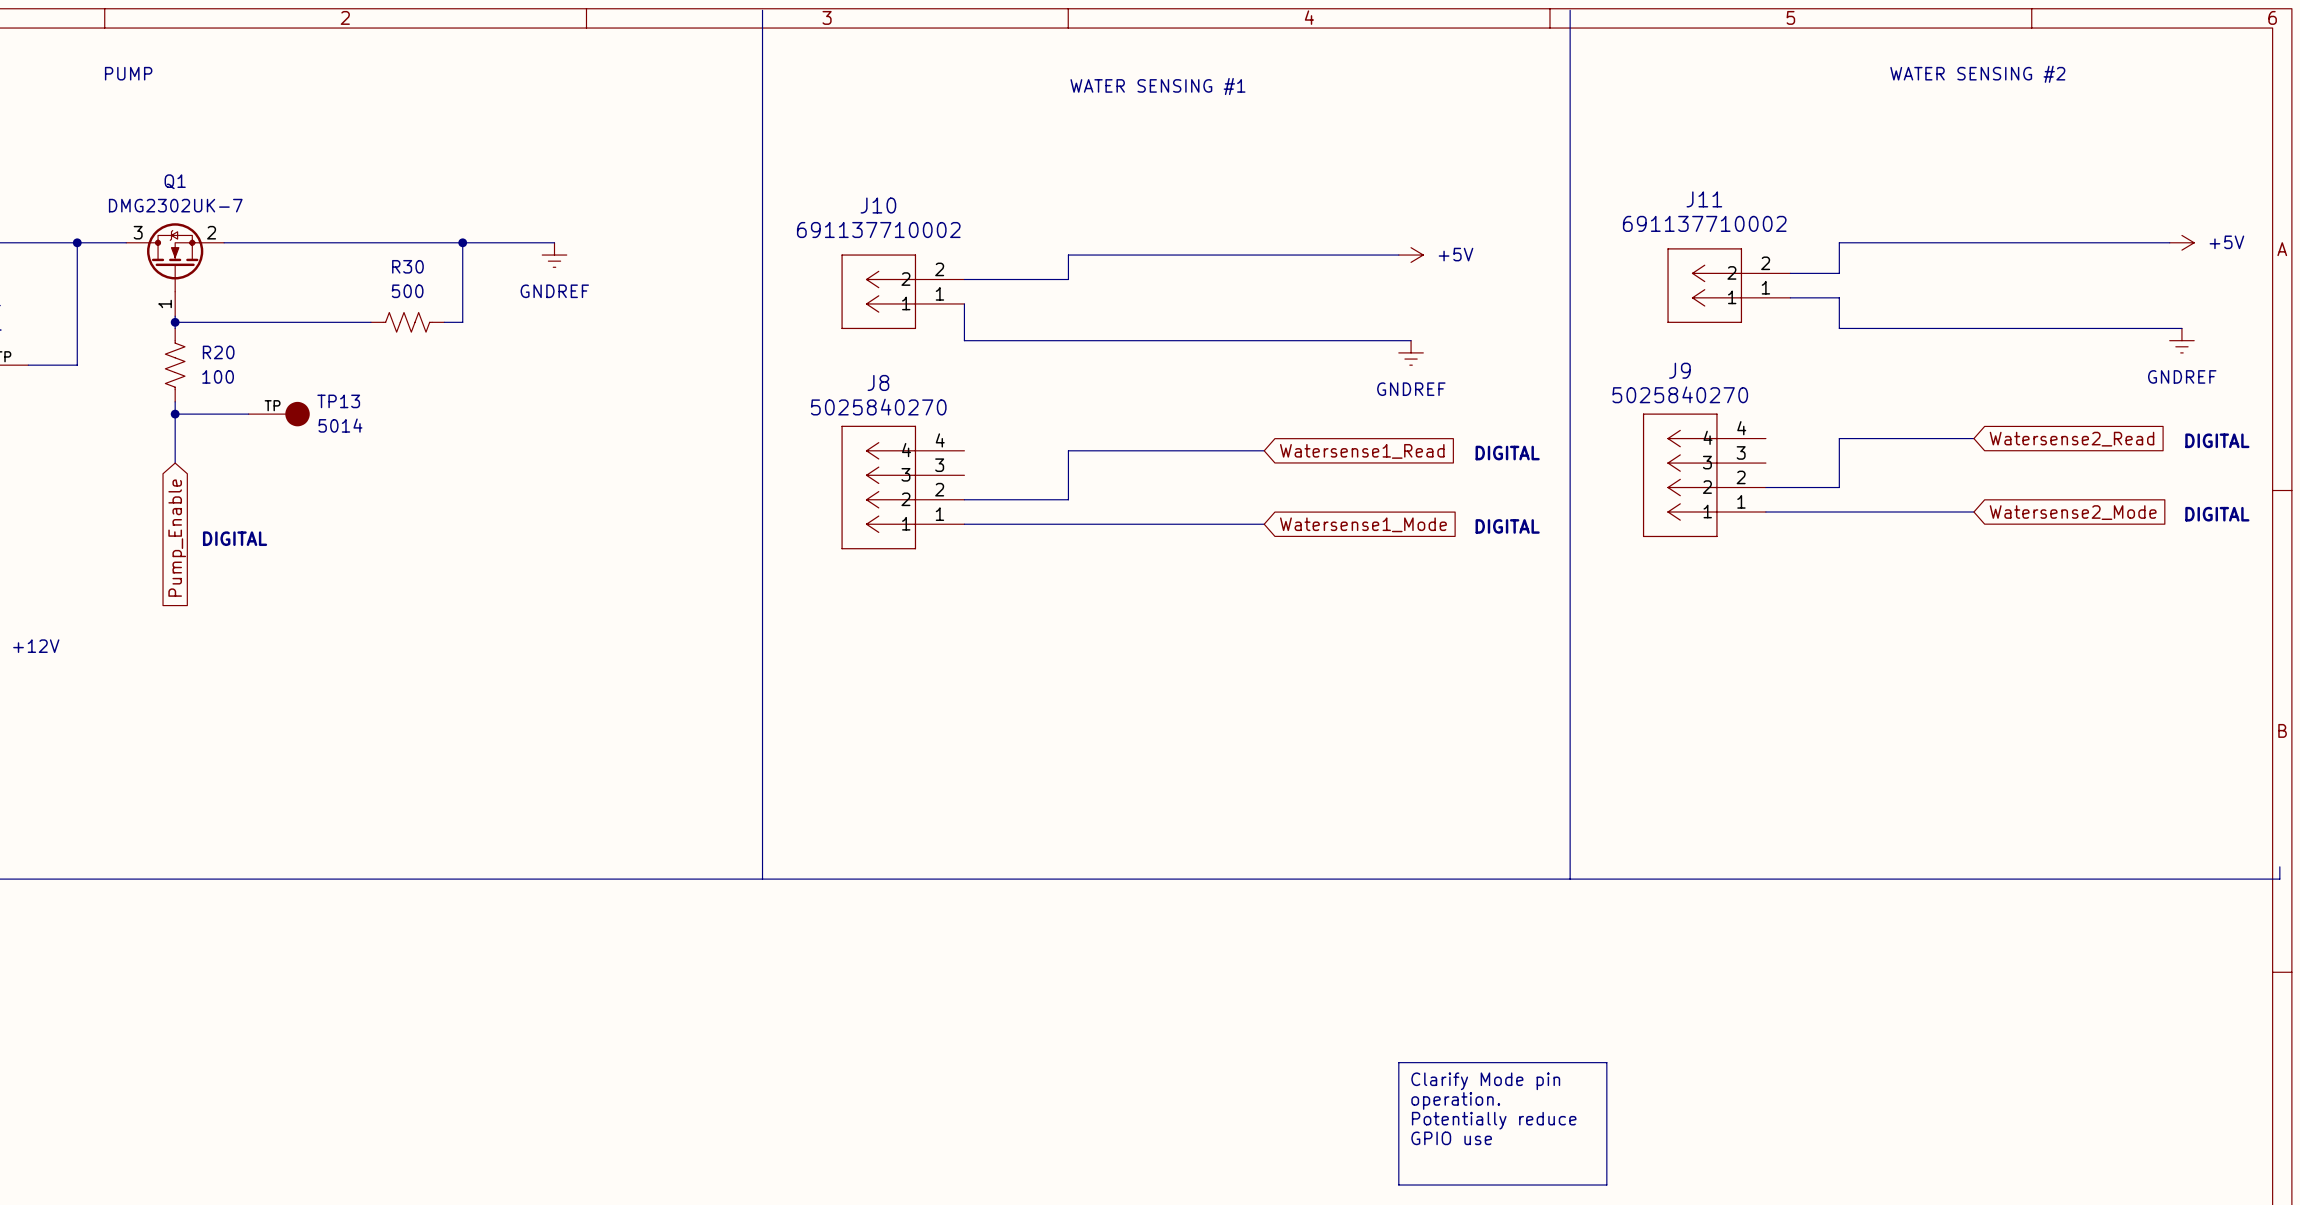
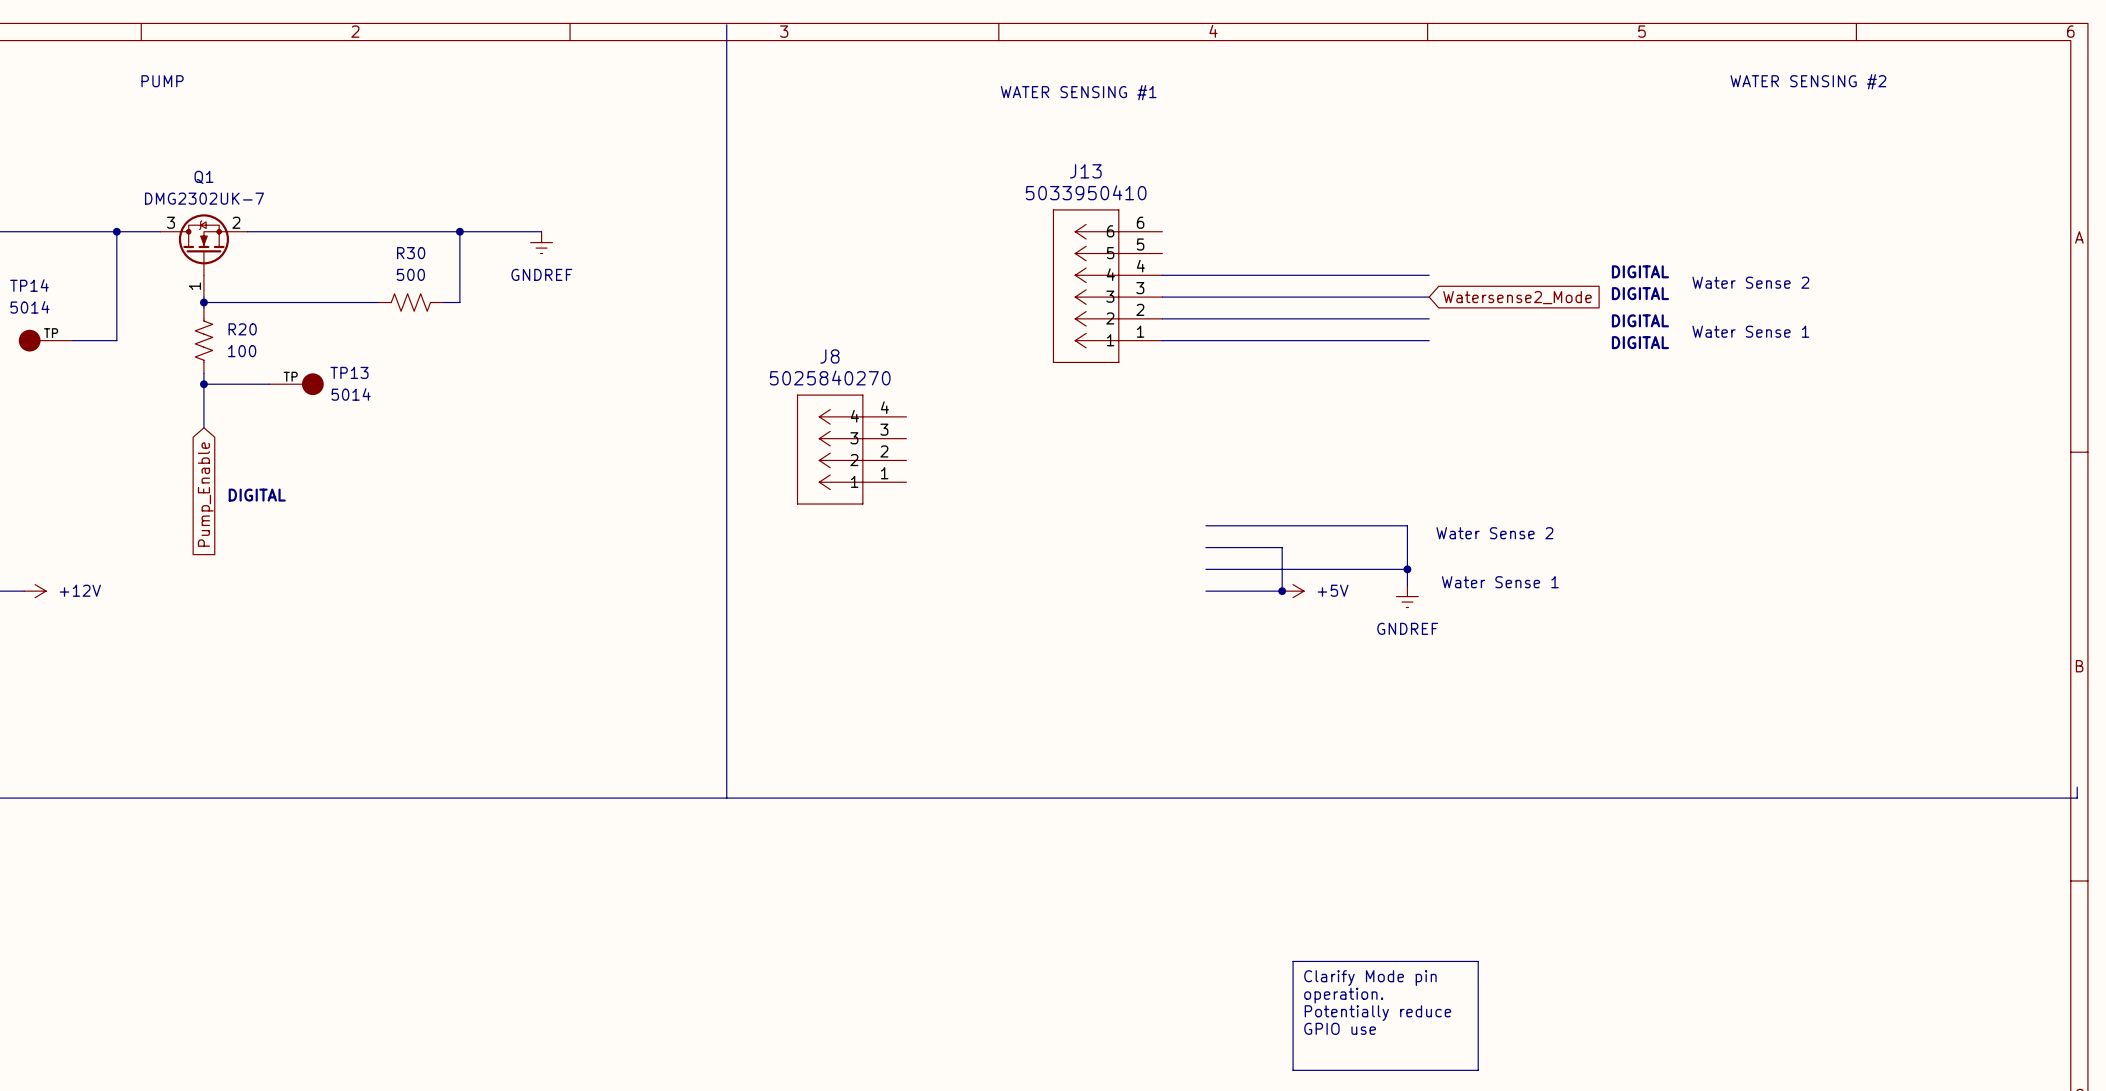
line: (1570, 10) (1570, 879) -> none
wire: (2169, 242) (1839, 242) (1839, 273) (1790, 273) -> none
power symbol: +5V (2181, 242) -> none
wire: (1398, 255) (1068, 255) (1068, 279) (964, 279) -> none
power symbol: +5V (1411, 255) -> none
J11: 691137710002 (1728, 285) -> none
text: none -> DIGITAL (1640, 271)
J10: 691137710002 (902, 291) -> none
wire: none -> (1162, 275) (1429, 275)
wire: (1790, 297) (1839, 297) (1839, 328) (2181, 328) -> none
text: none -> Water Sense 2 (1750, 282)
wire: (964, 303) (964, 340) (1251, 340) -> none
J13: none -> 5033950410 (1107, 286)
text: none -> DIGITAL (1640, 293)
wire: none -> (1162, 297) (1429, 297)
global label: none -> Watersense2_Mode (1517, 297)
wire: none -> (1303, 318) (1429, 318)
power symbol: GNDREF (2181, 340) -> none
text: none -> DIGITAL (1640, 320)
power symbol: GNDREF (1411, 352) -> none
text: none -> Water Sense 1 (1750, 331)
wire: none -> (1162, 340) (1429, 340)
text: none -> DIGITAL (1640, 342)
wire: (1973, 438) (1839, 438) (1839, 487) (1765, 487) -> none
global label: Watersense2_Read (2071, 439) -> none
text: DIGITAL (2217, 440) -> none
wire: (1264, 450) (1068, 450) (1068, 499) (964, 499) -> none
global label: Watersense1_Read (1362, 451) -> none
text: DIGITAL (1507, 453) -> none
J9: 5025840270 (1704, 475) -> none
wire: (1765, 511) (1973, 511) -> none
global label: Watersense2_Mode (2073, 512) -> none
text: DIGITAL (2217, 514) -> none
wire: (964, 524) (1264, 524) -> none
global label: Watersense1_Mode (1363, 524) -> none
text: DIGITAL (1507, 526) -> none
wire: none -> (1205, 525) (1407, 525) (1407, 585)
text: none -> Water Sense 2 (1494, 533)
wire: none -> (1205, 547) (1282, 547) (1282, 591) (1205, 591)
wire: none -> (1205, 569) (1407, 569)
junction: none -> (1407, 569)
text: none -> Water Sense 1 (1500, 582)
junction: none -> (1282, 591)
power symbol: none -> +5V (1293, 591)
power symbol: none -> GNDREF (1407, 596)

